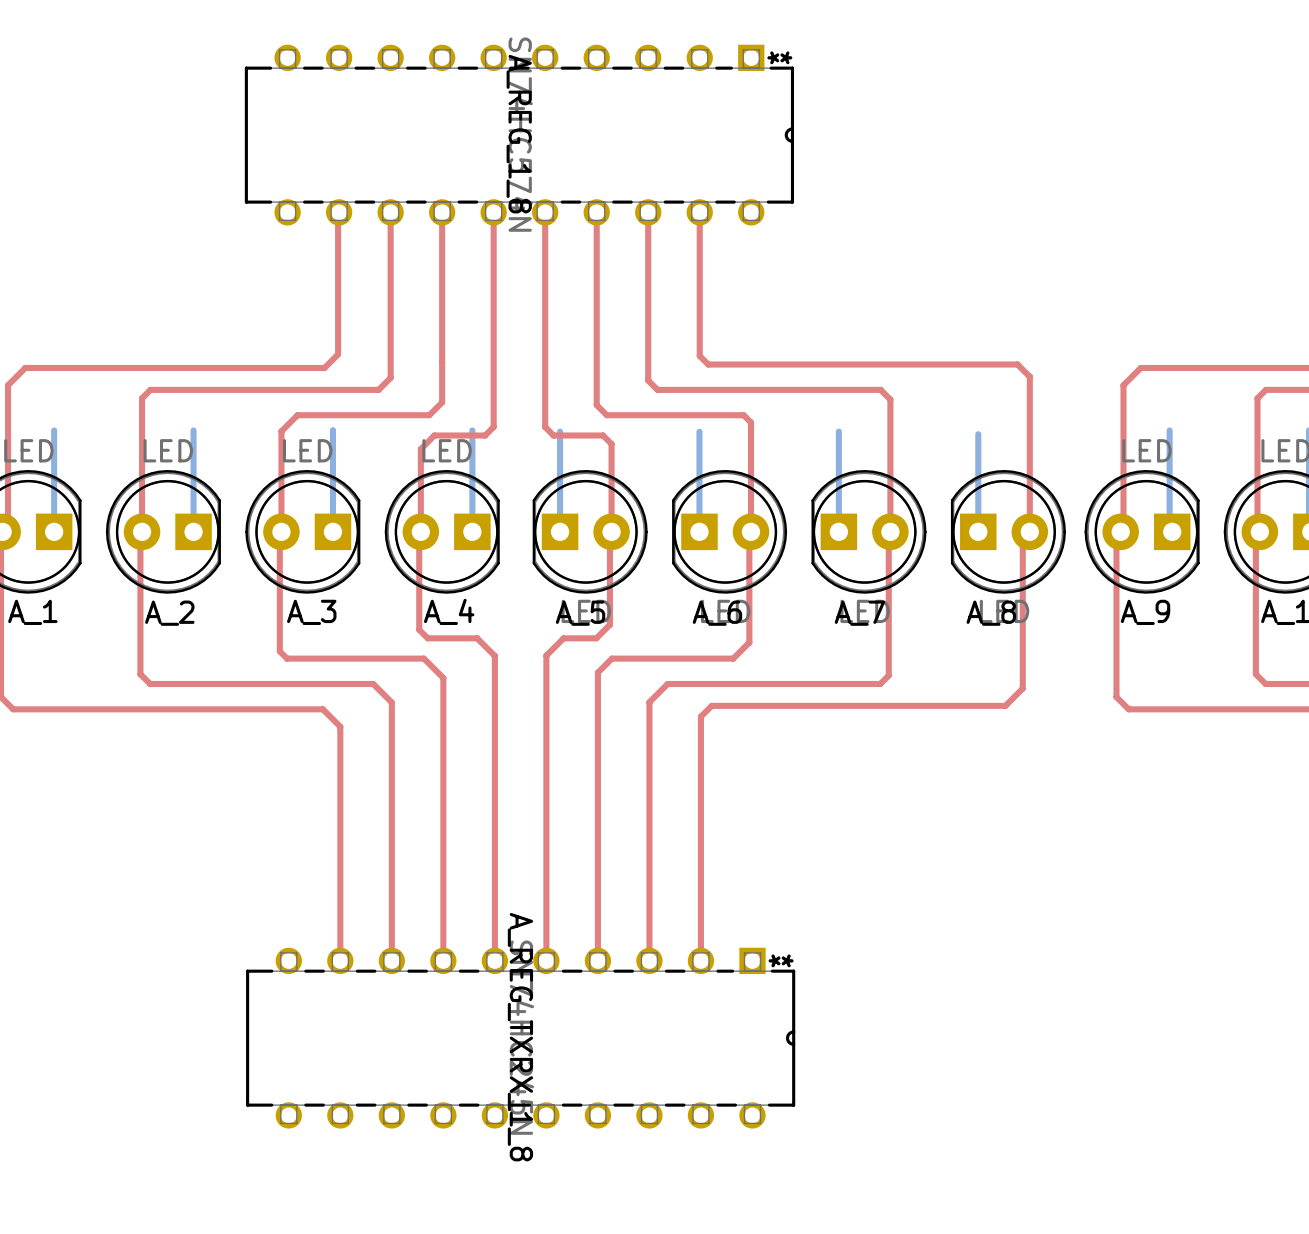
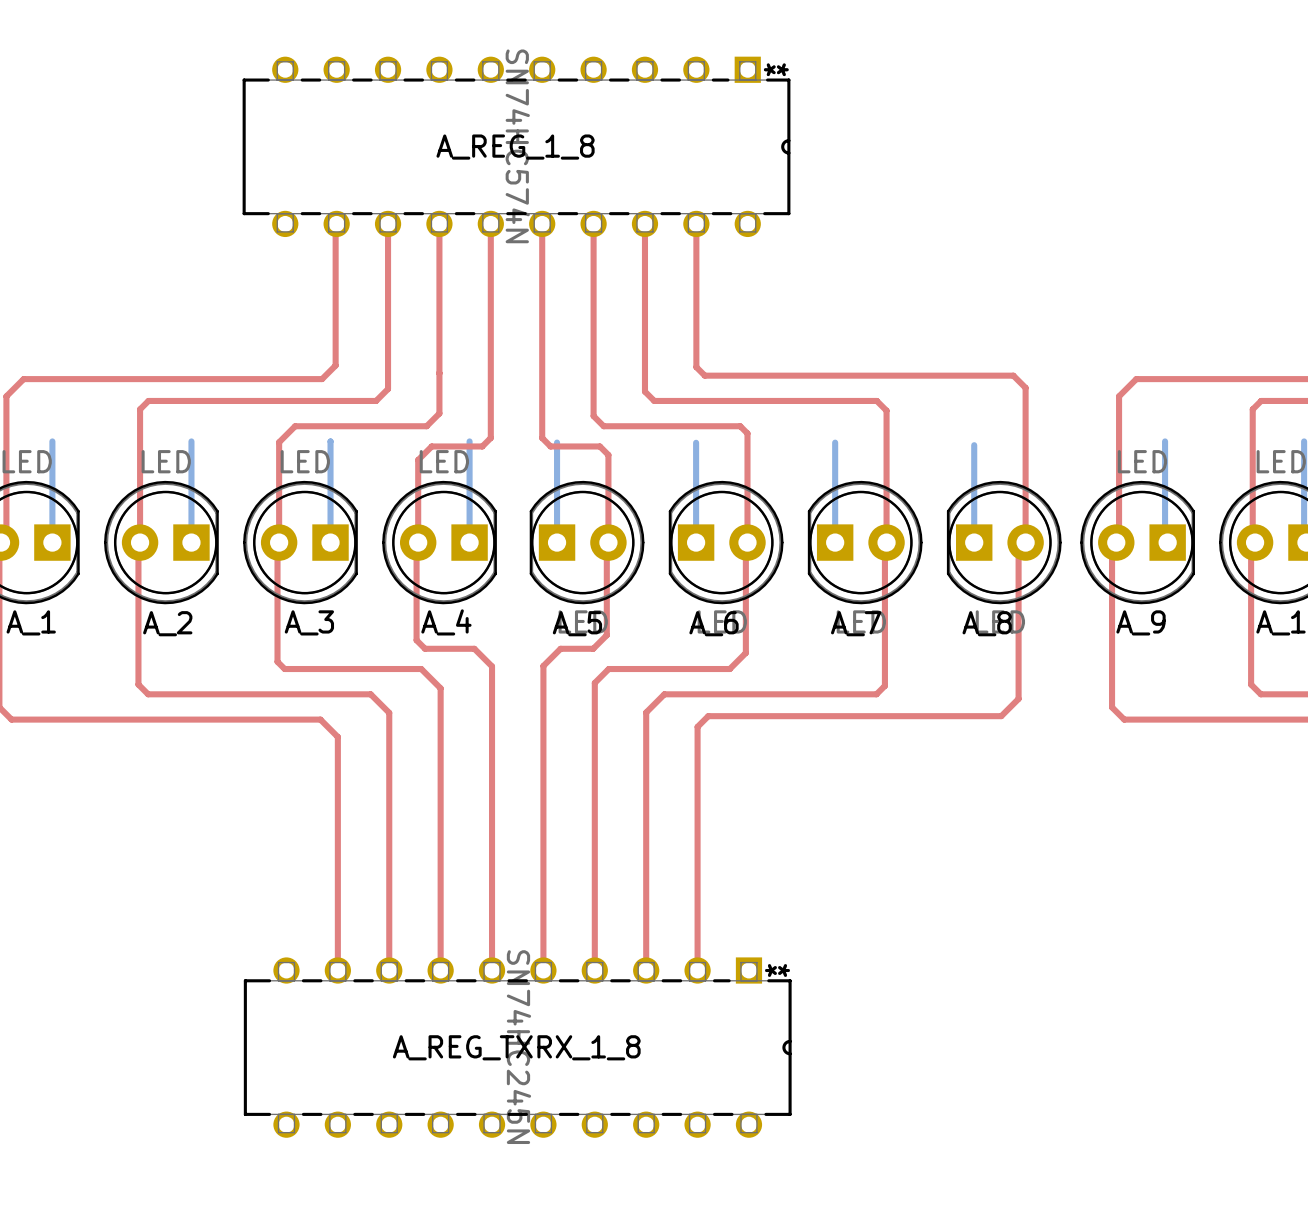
A_REG_1_8 name rotation: 0° (519, 134) -> 90° counterclockwise (515, 147)
A_REG_TXRX_1_8 name rotation: 0° (520, 1037) -> 90° counterclockwise (516, 1047)

